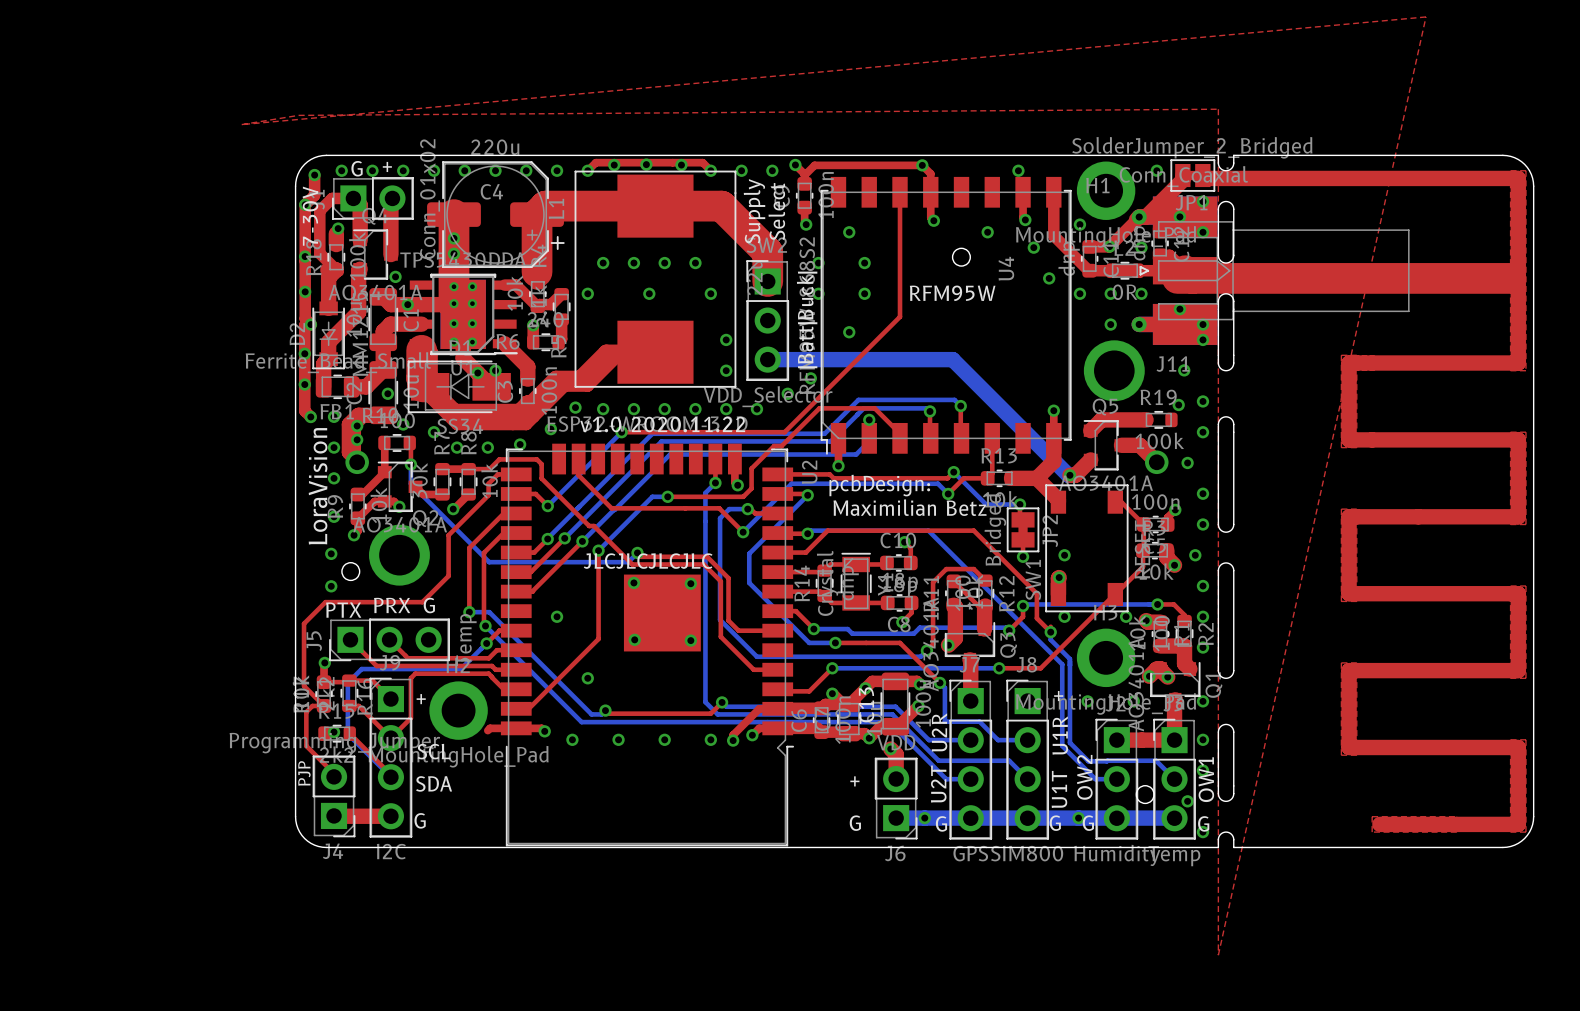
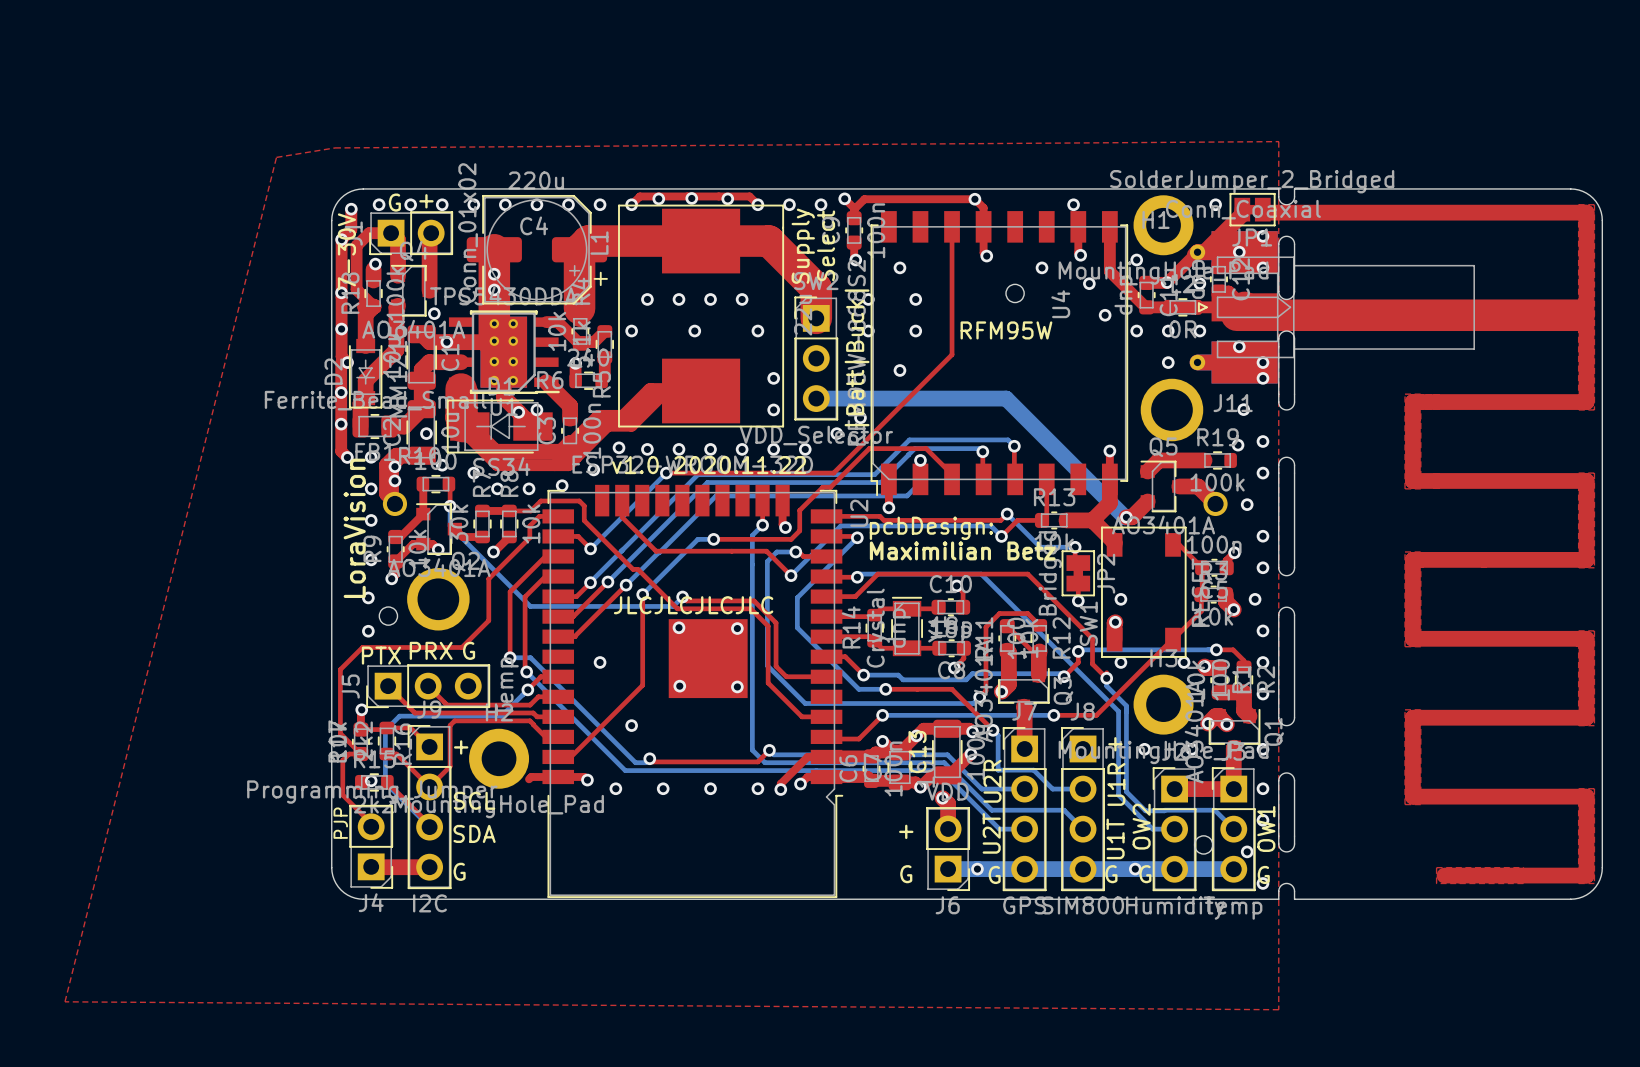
top zone outline: (241, 124) (1426, 16) (1218, 955) -> (276, 157) (65, 1001) (1278, 1009)

